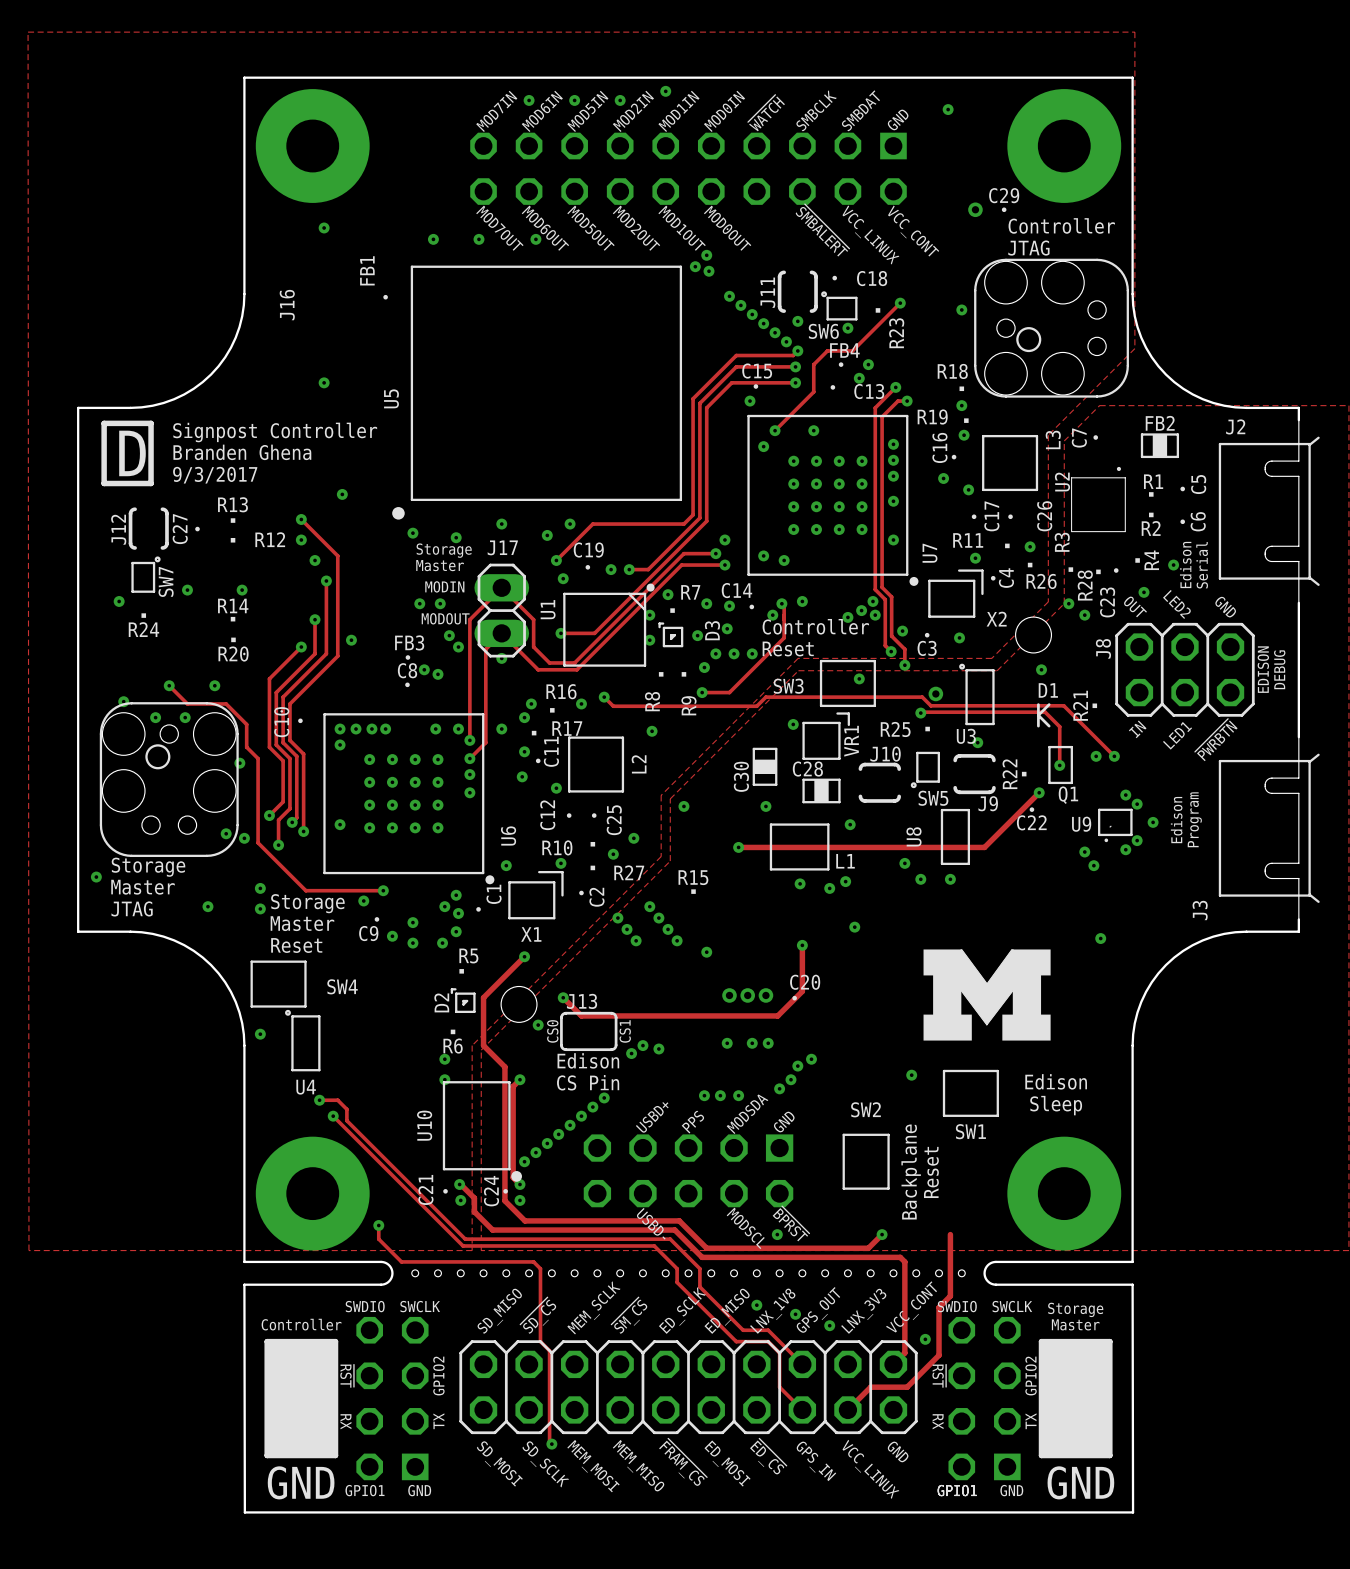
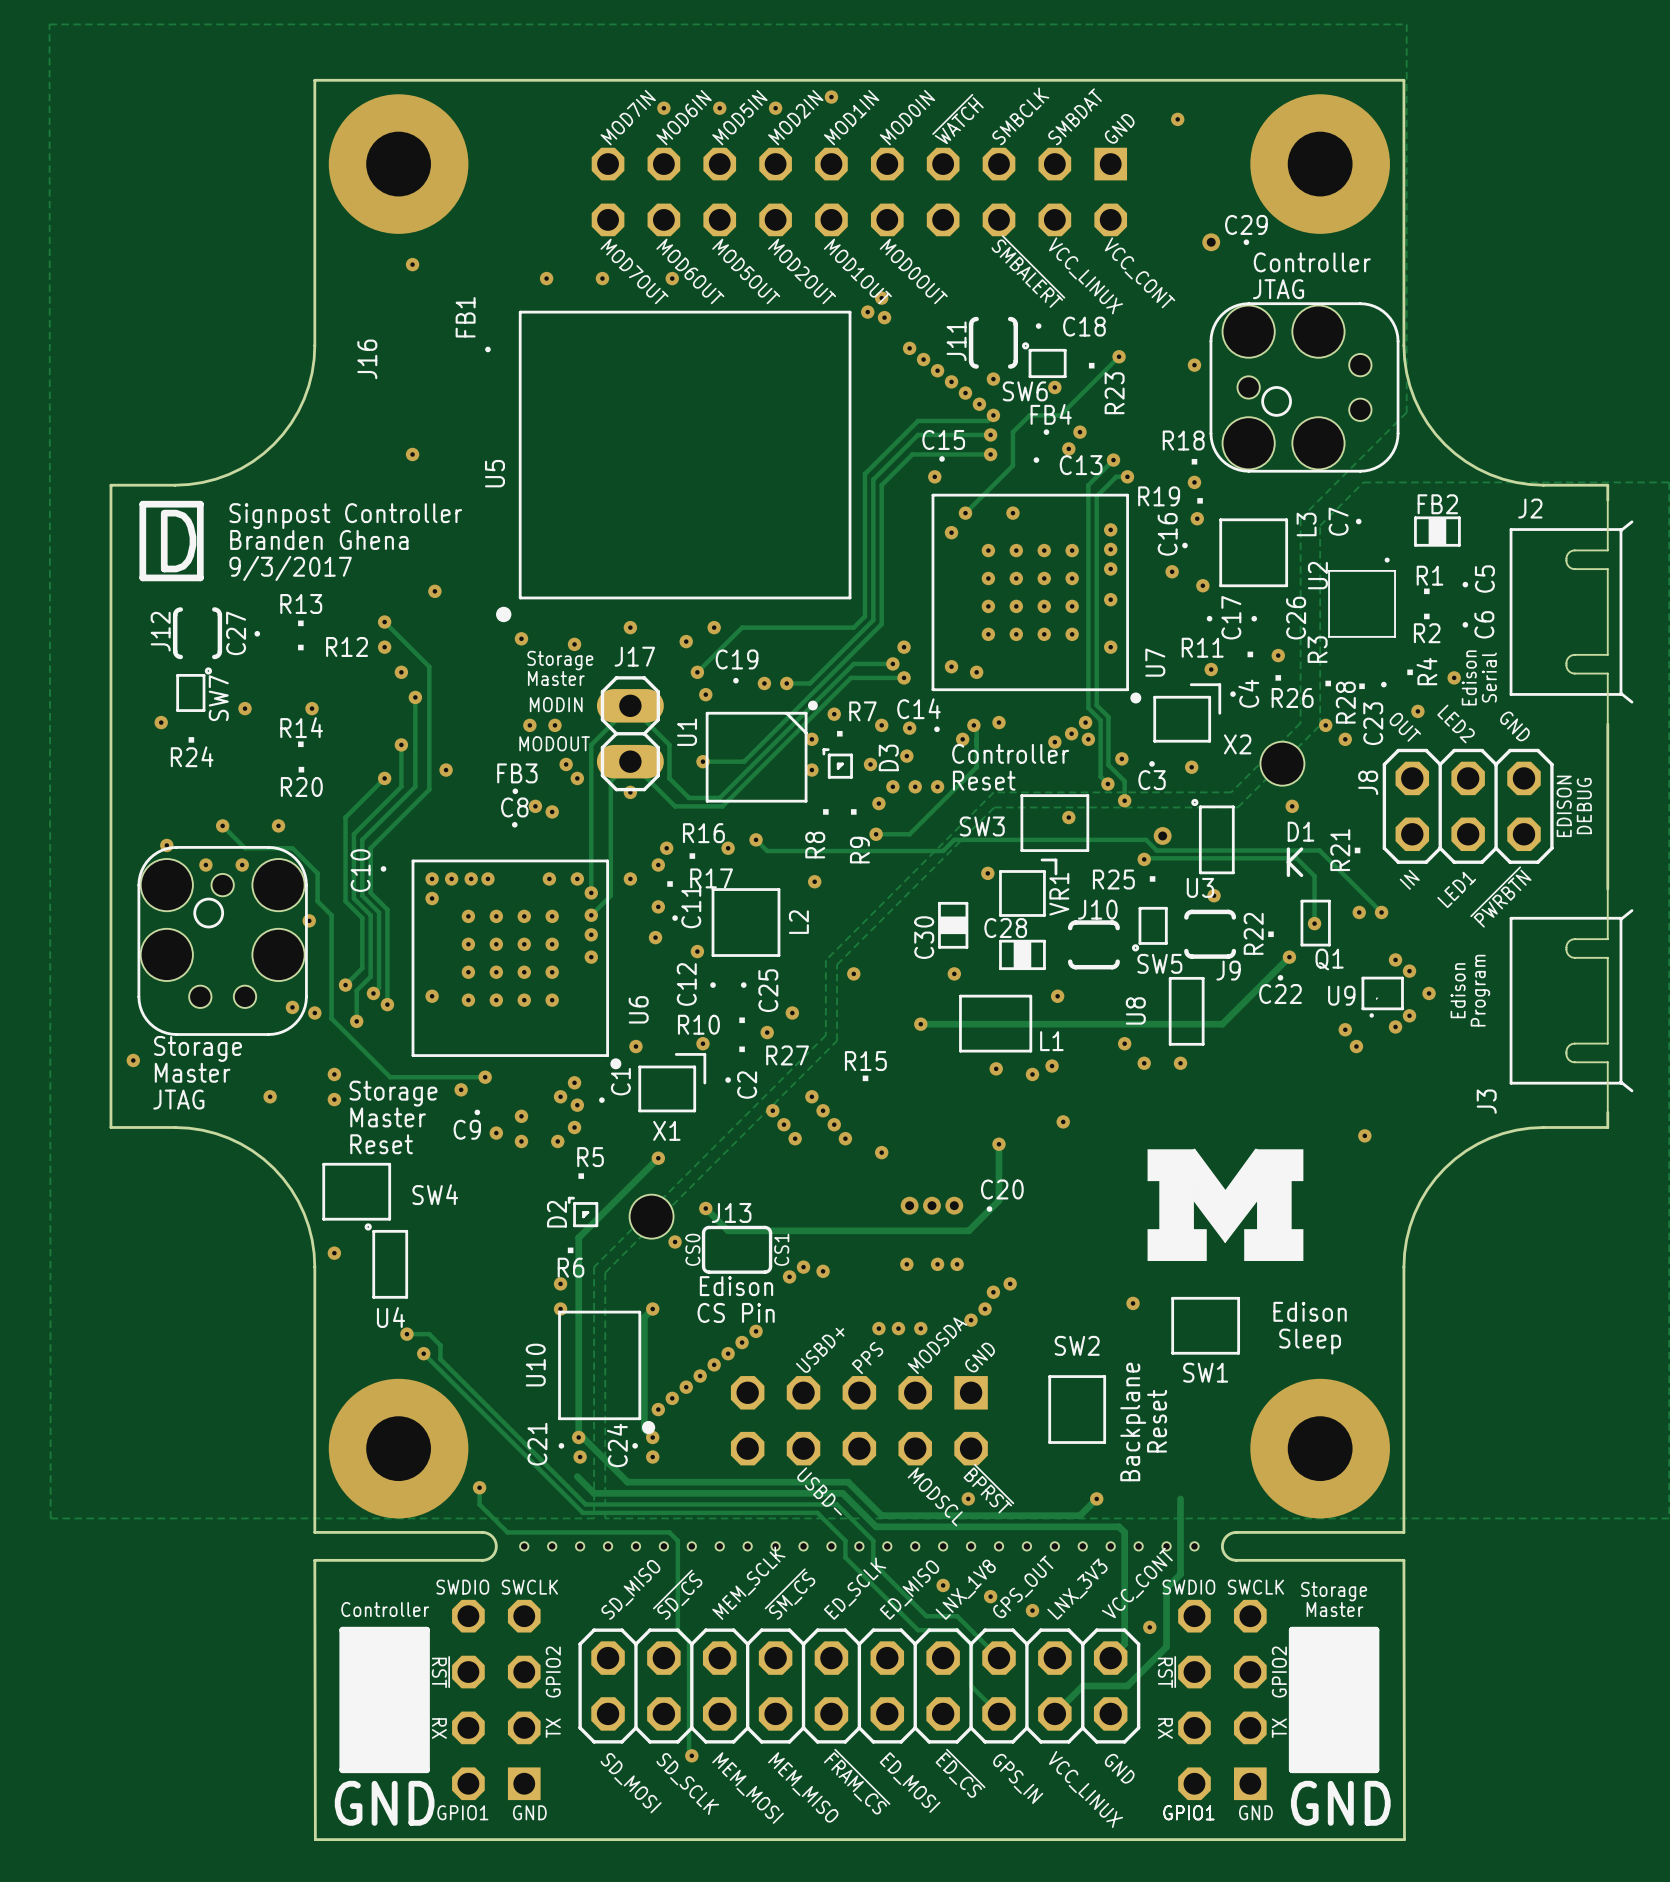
track: (483, 997) (483, 1045) (504, 1066) (504, 1200) (525, 1220) -> (608, 1208) (578, 1237) (578, 1437)
track: (460, 1184) (474, 1198) (474, 1211) (492, 1230) -> (577, 1476) (594, 1493) (619, 1493)
track: none -> (580, 1437) (582, 1437) (627, 1482) (658, 1482)

